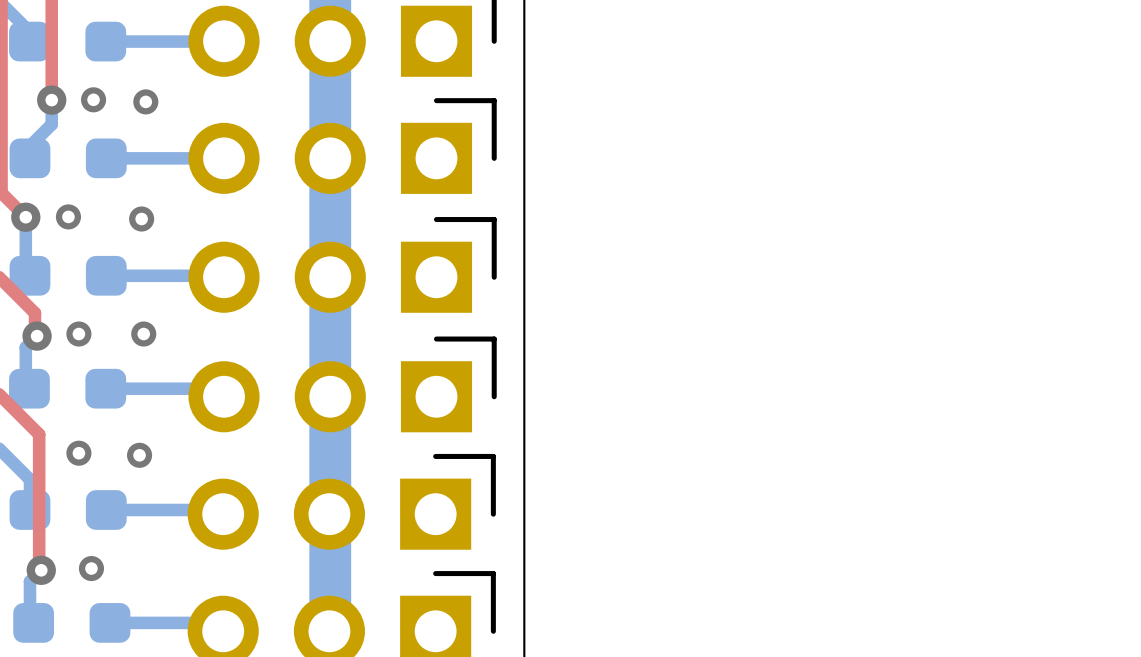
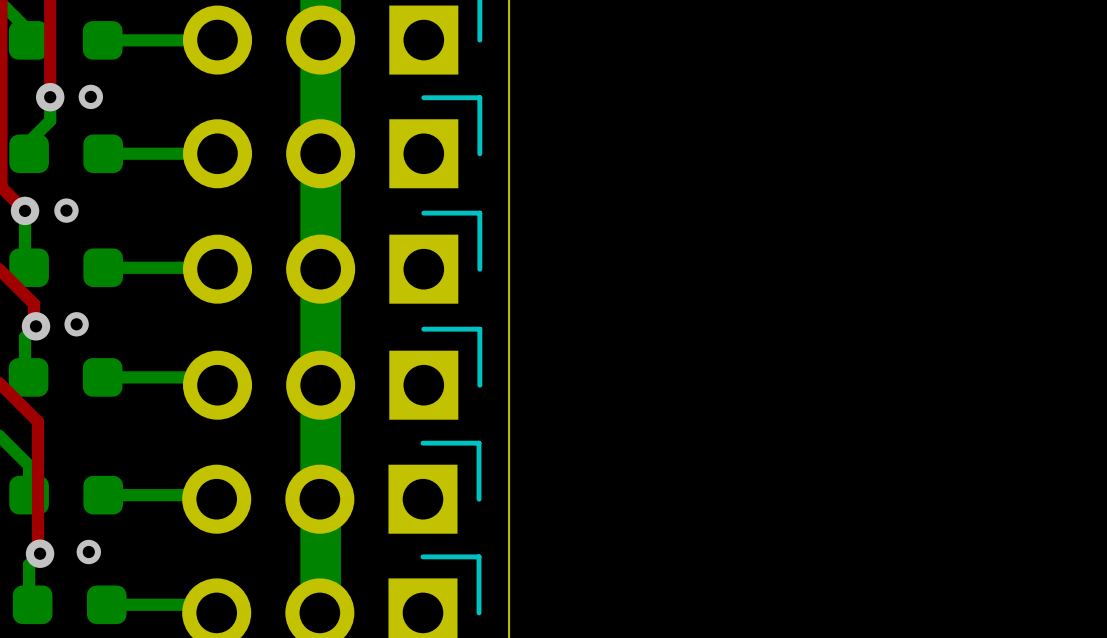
via: (145, 101) -> none
via: (141, 219) -> none
via: (143, 334) -> none
via: (78, 453) -> none
via: (139, 455) -> none

